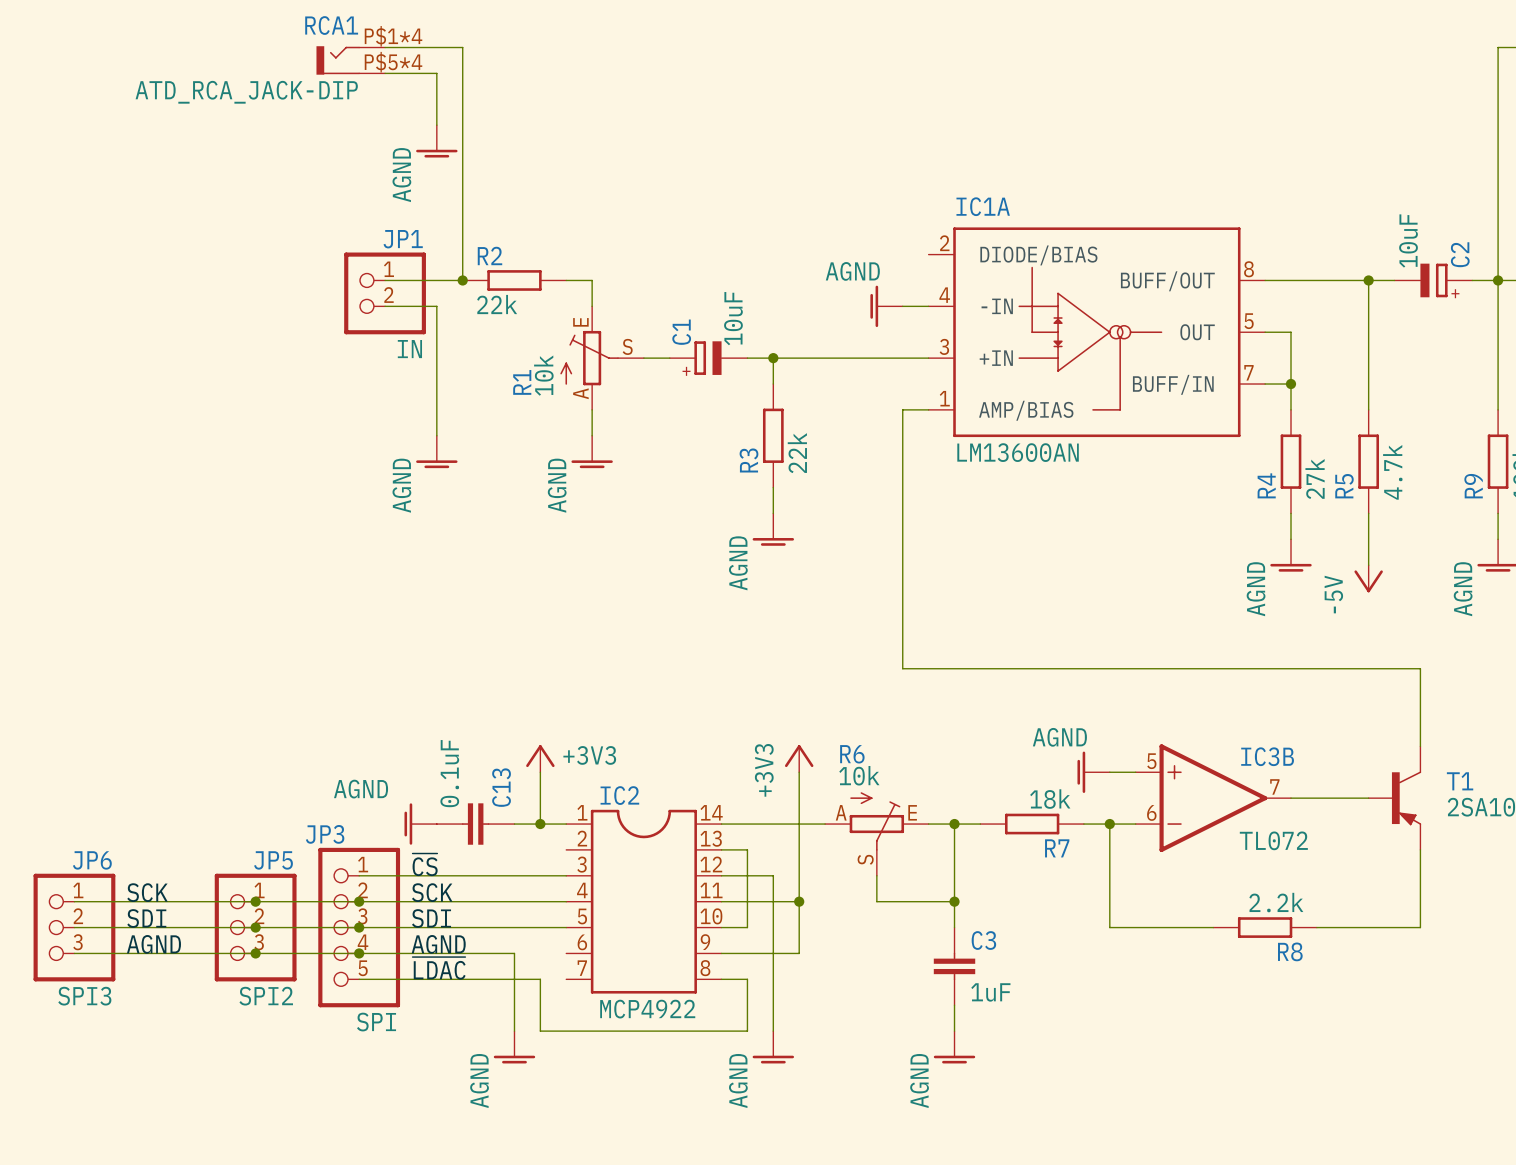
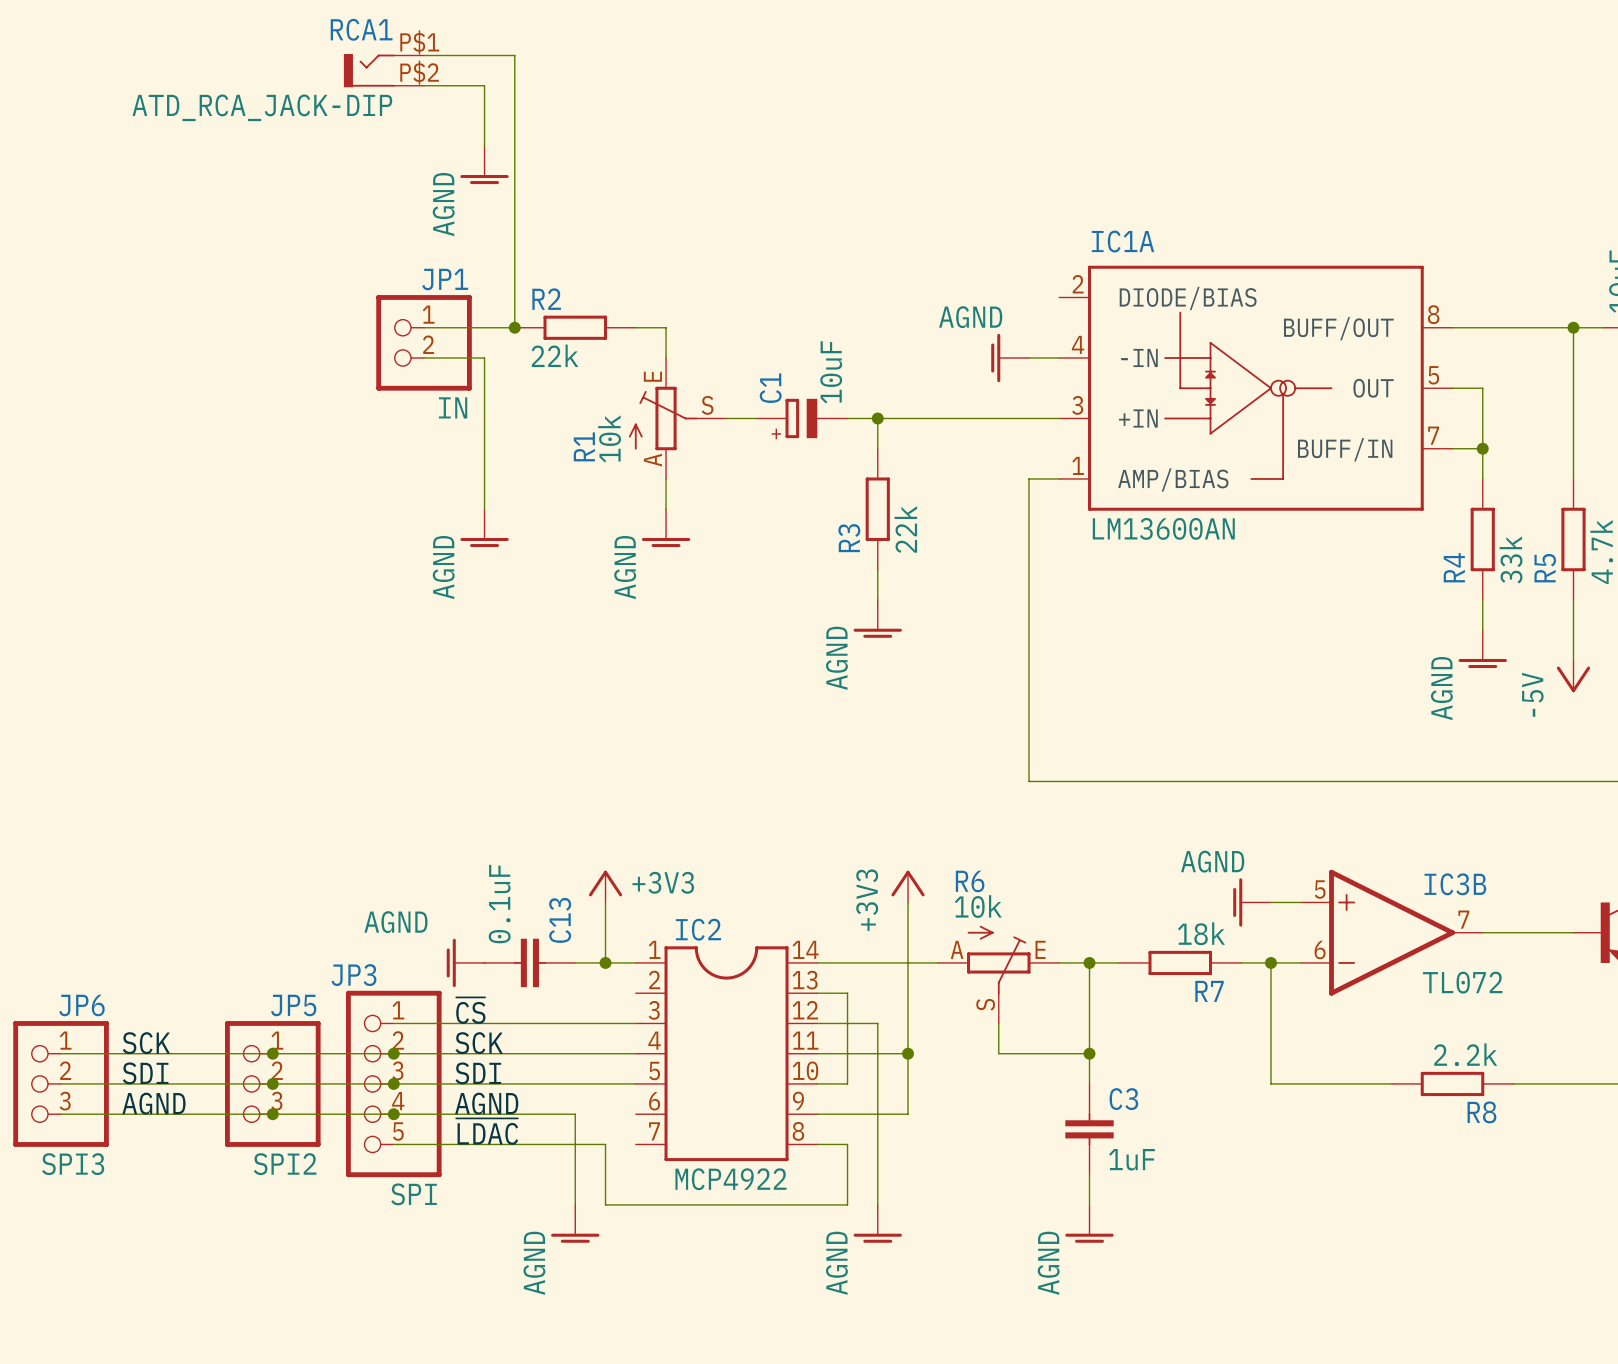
RCA1 pin number: P$1*4 (393, 36) -> P$1 (419, 42)
RCA1 pin number: P$5*4 (393, 62) -> P$2 (419, 72)
R4 value: 27k (1315, 479) -> 33k (1511, 559)

